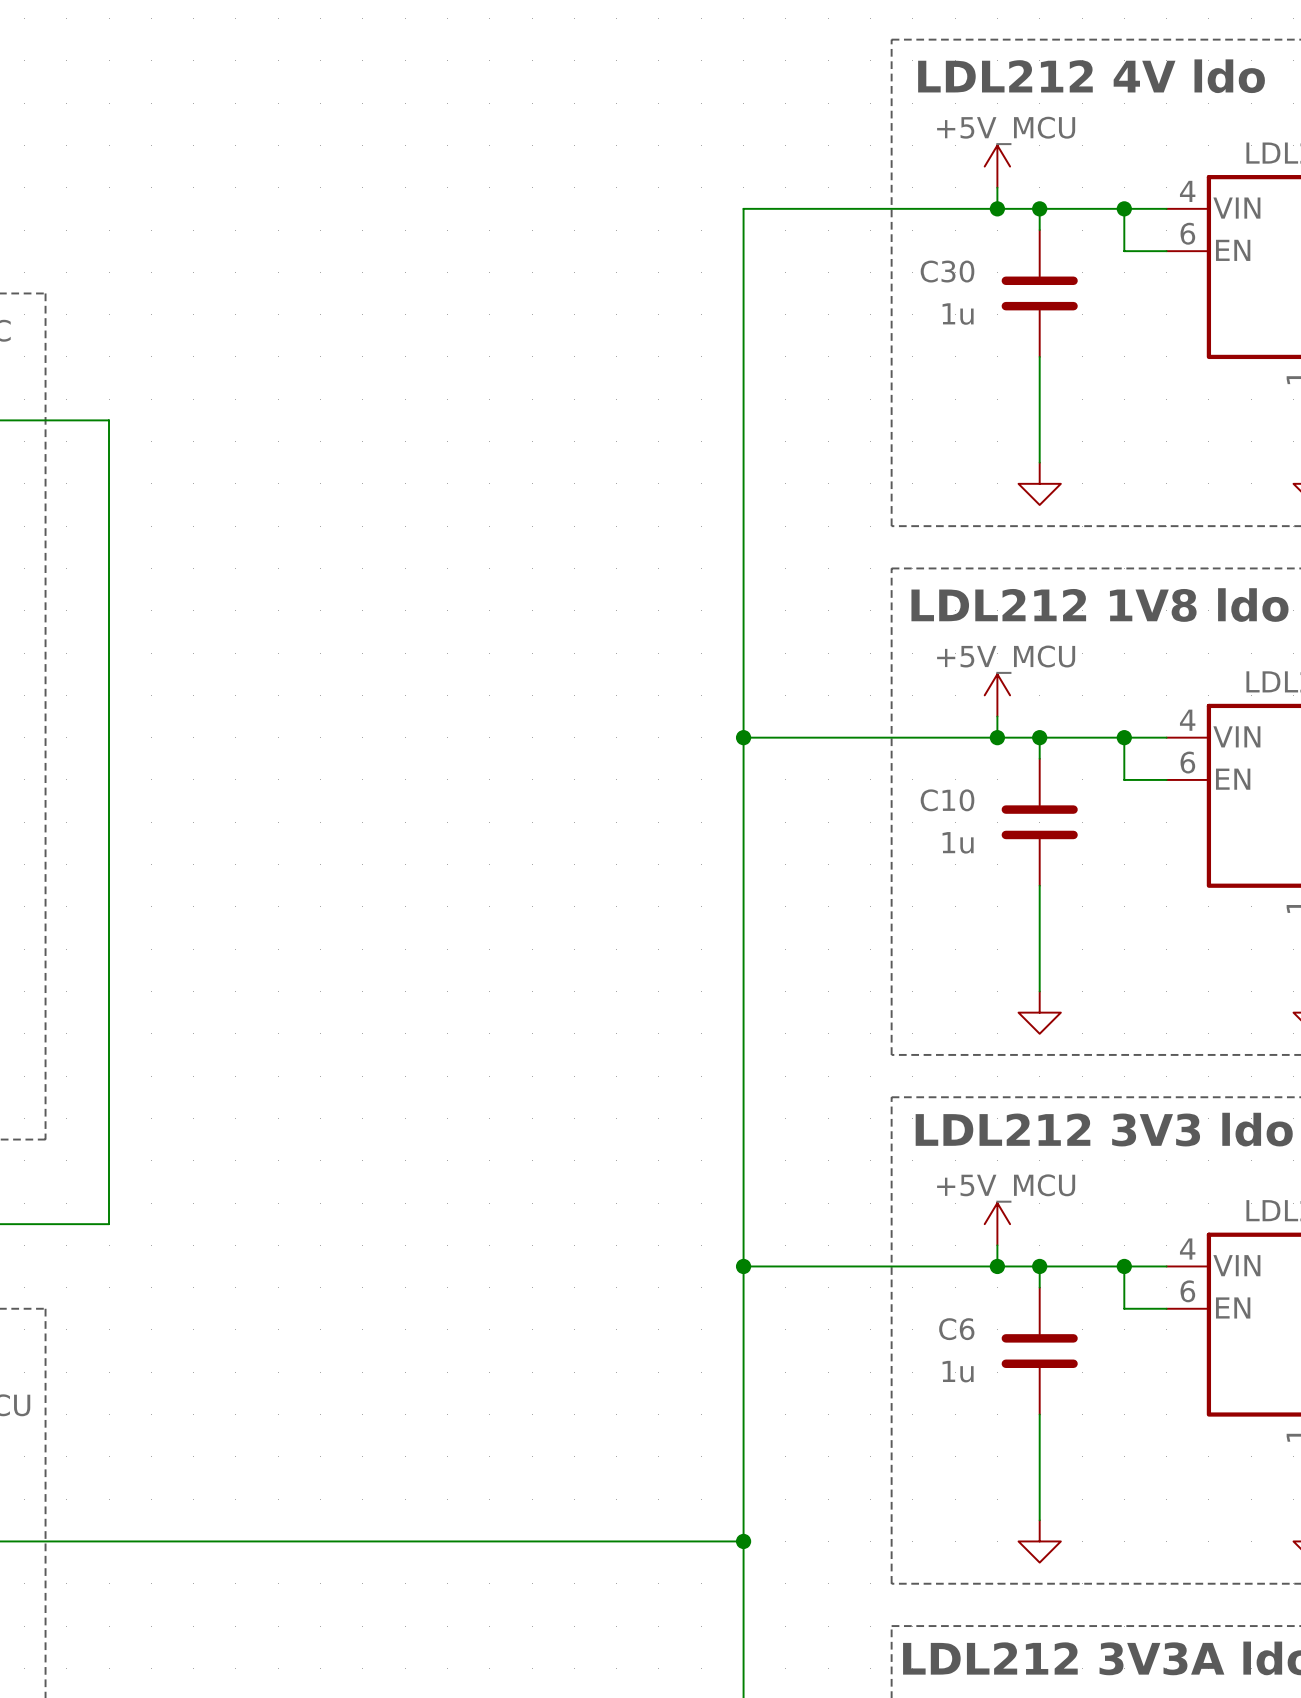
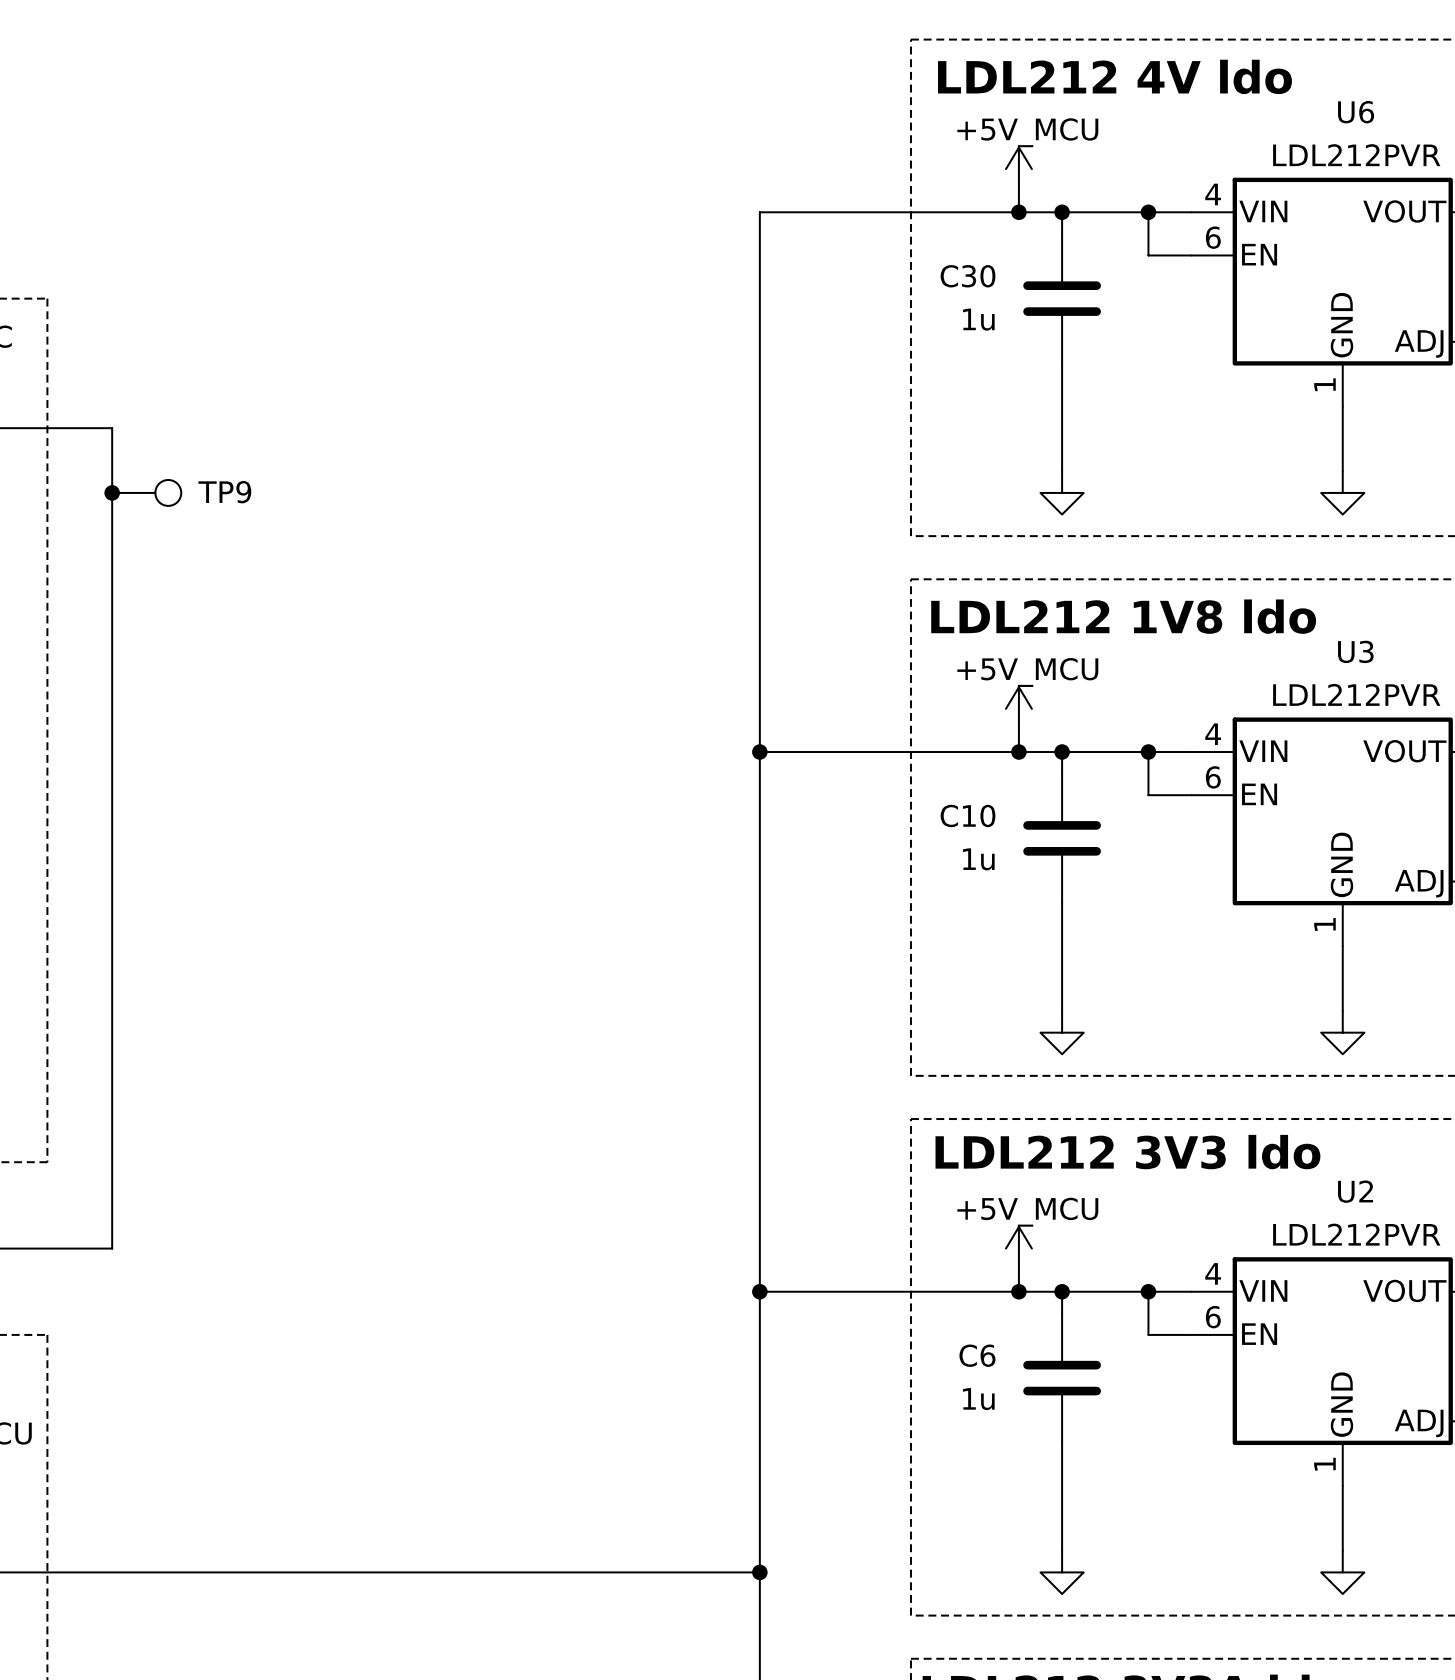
junction: none -> (112, 492)
TP9: none -> (146, 492)

